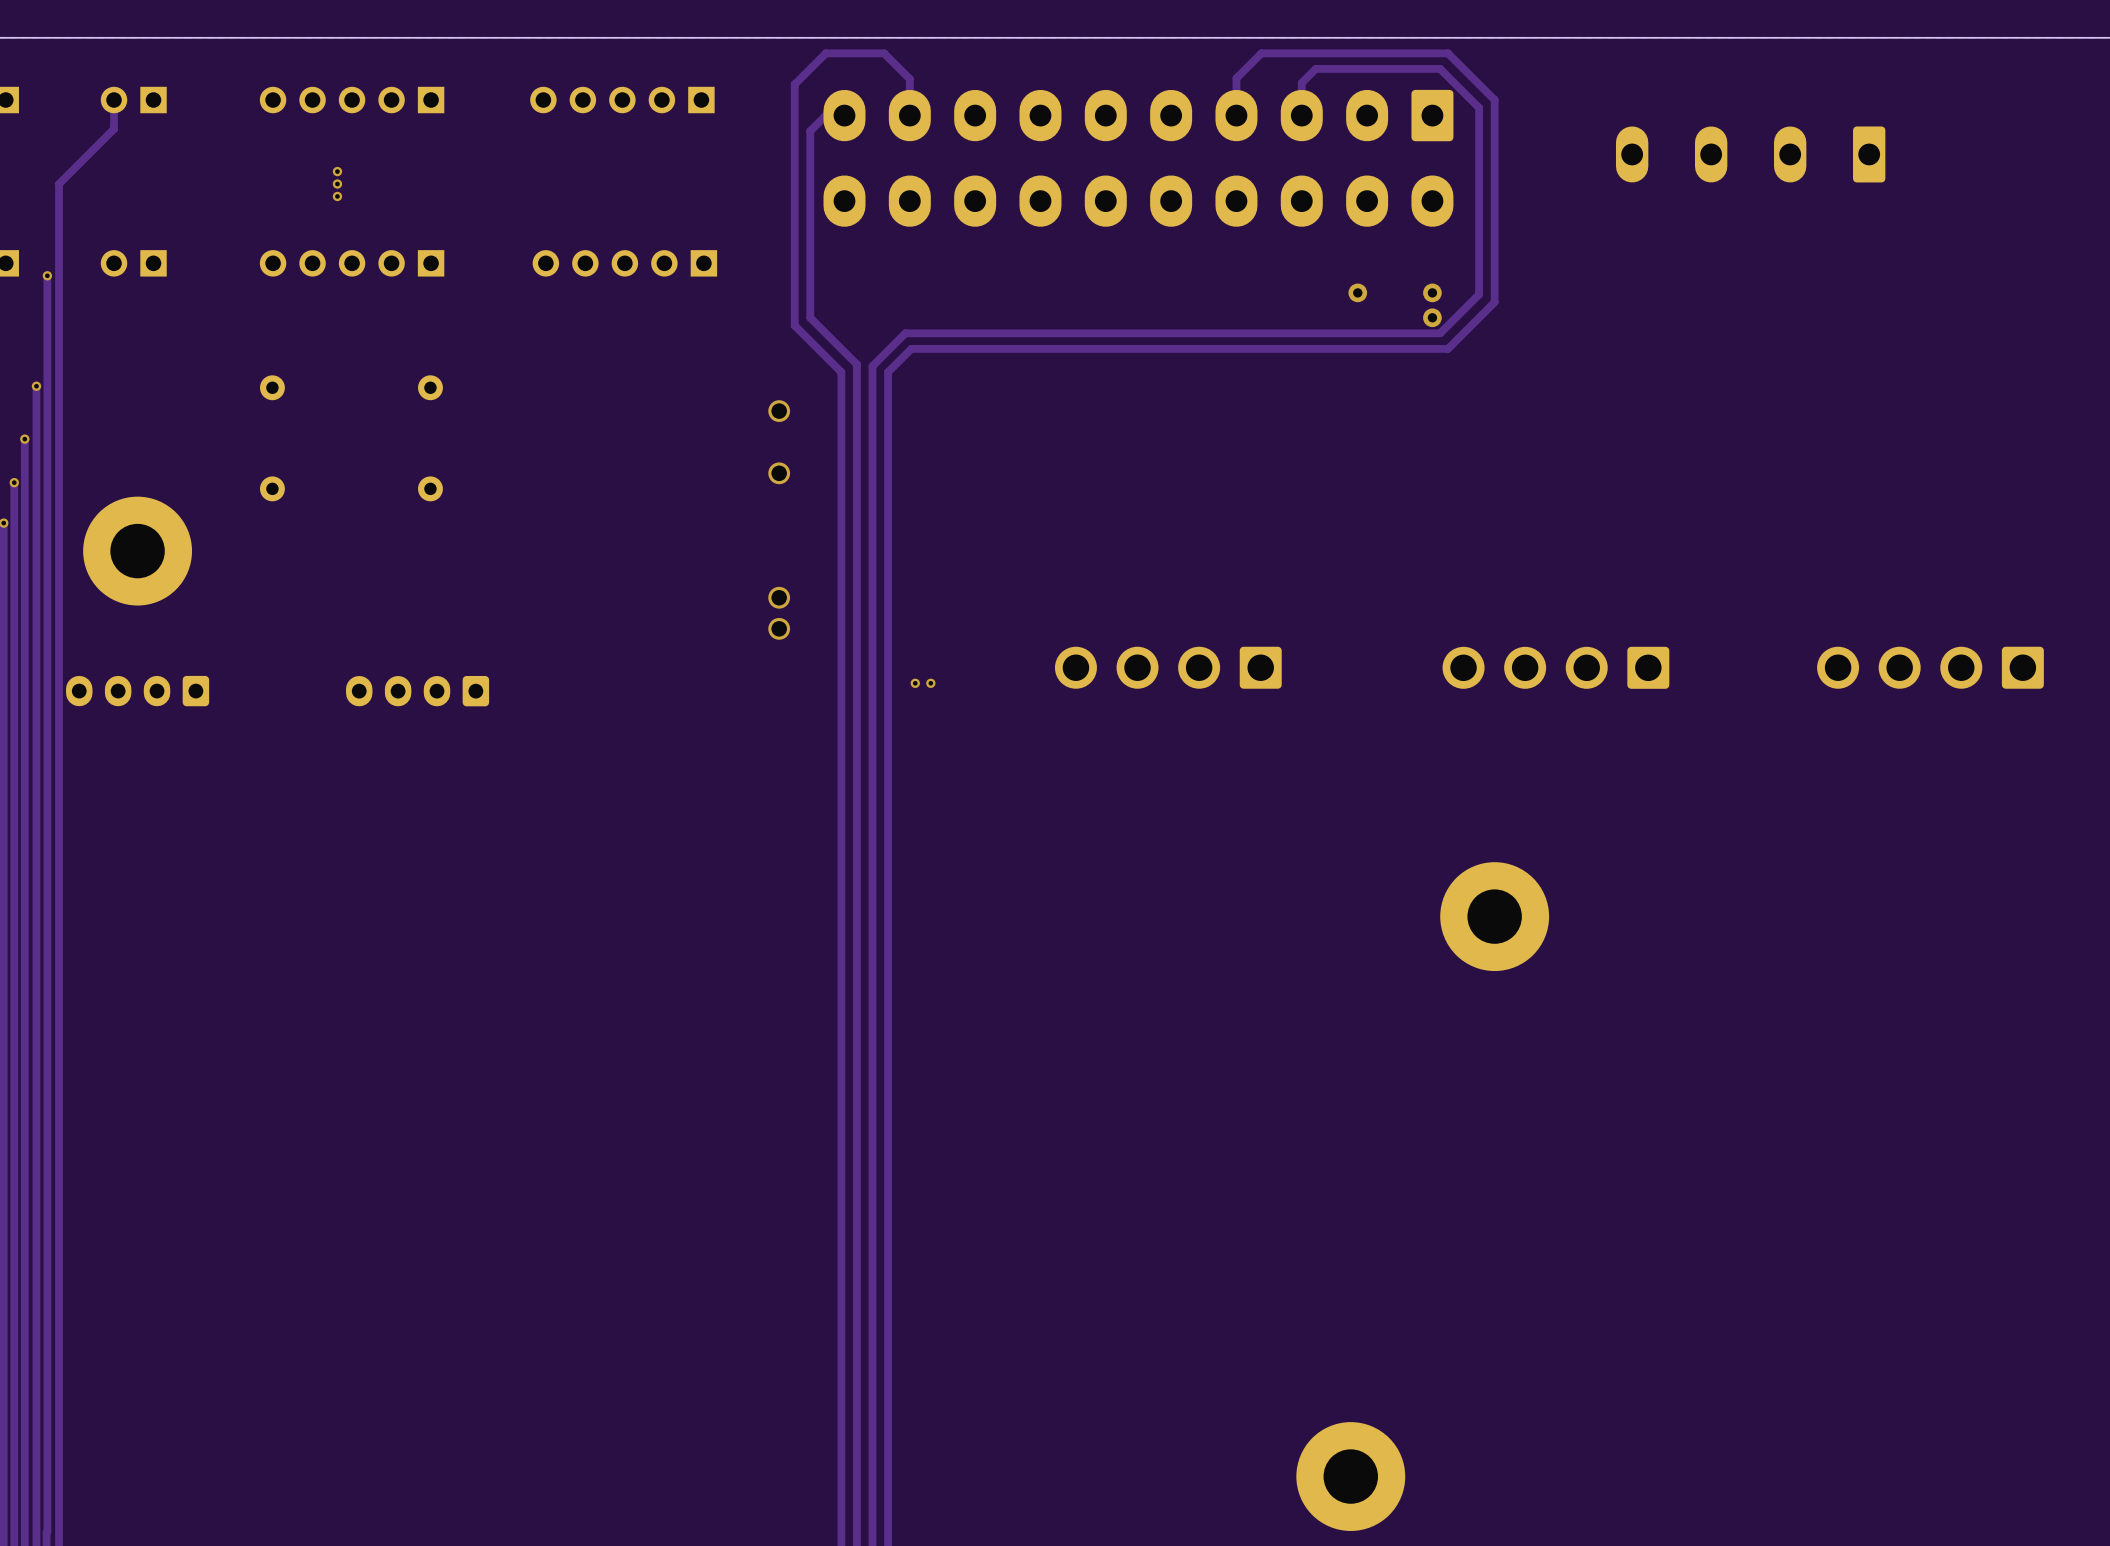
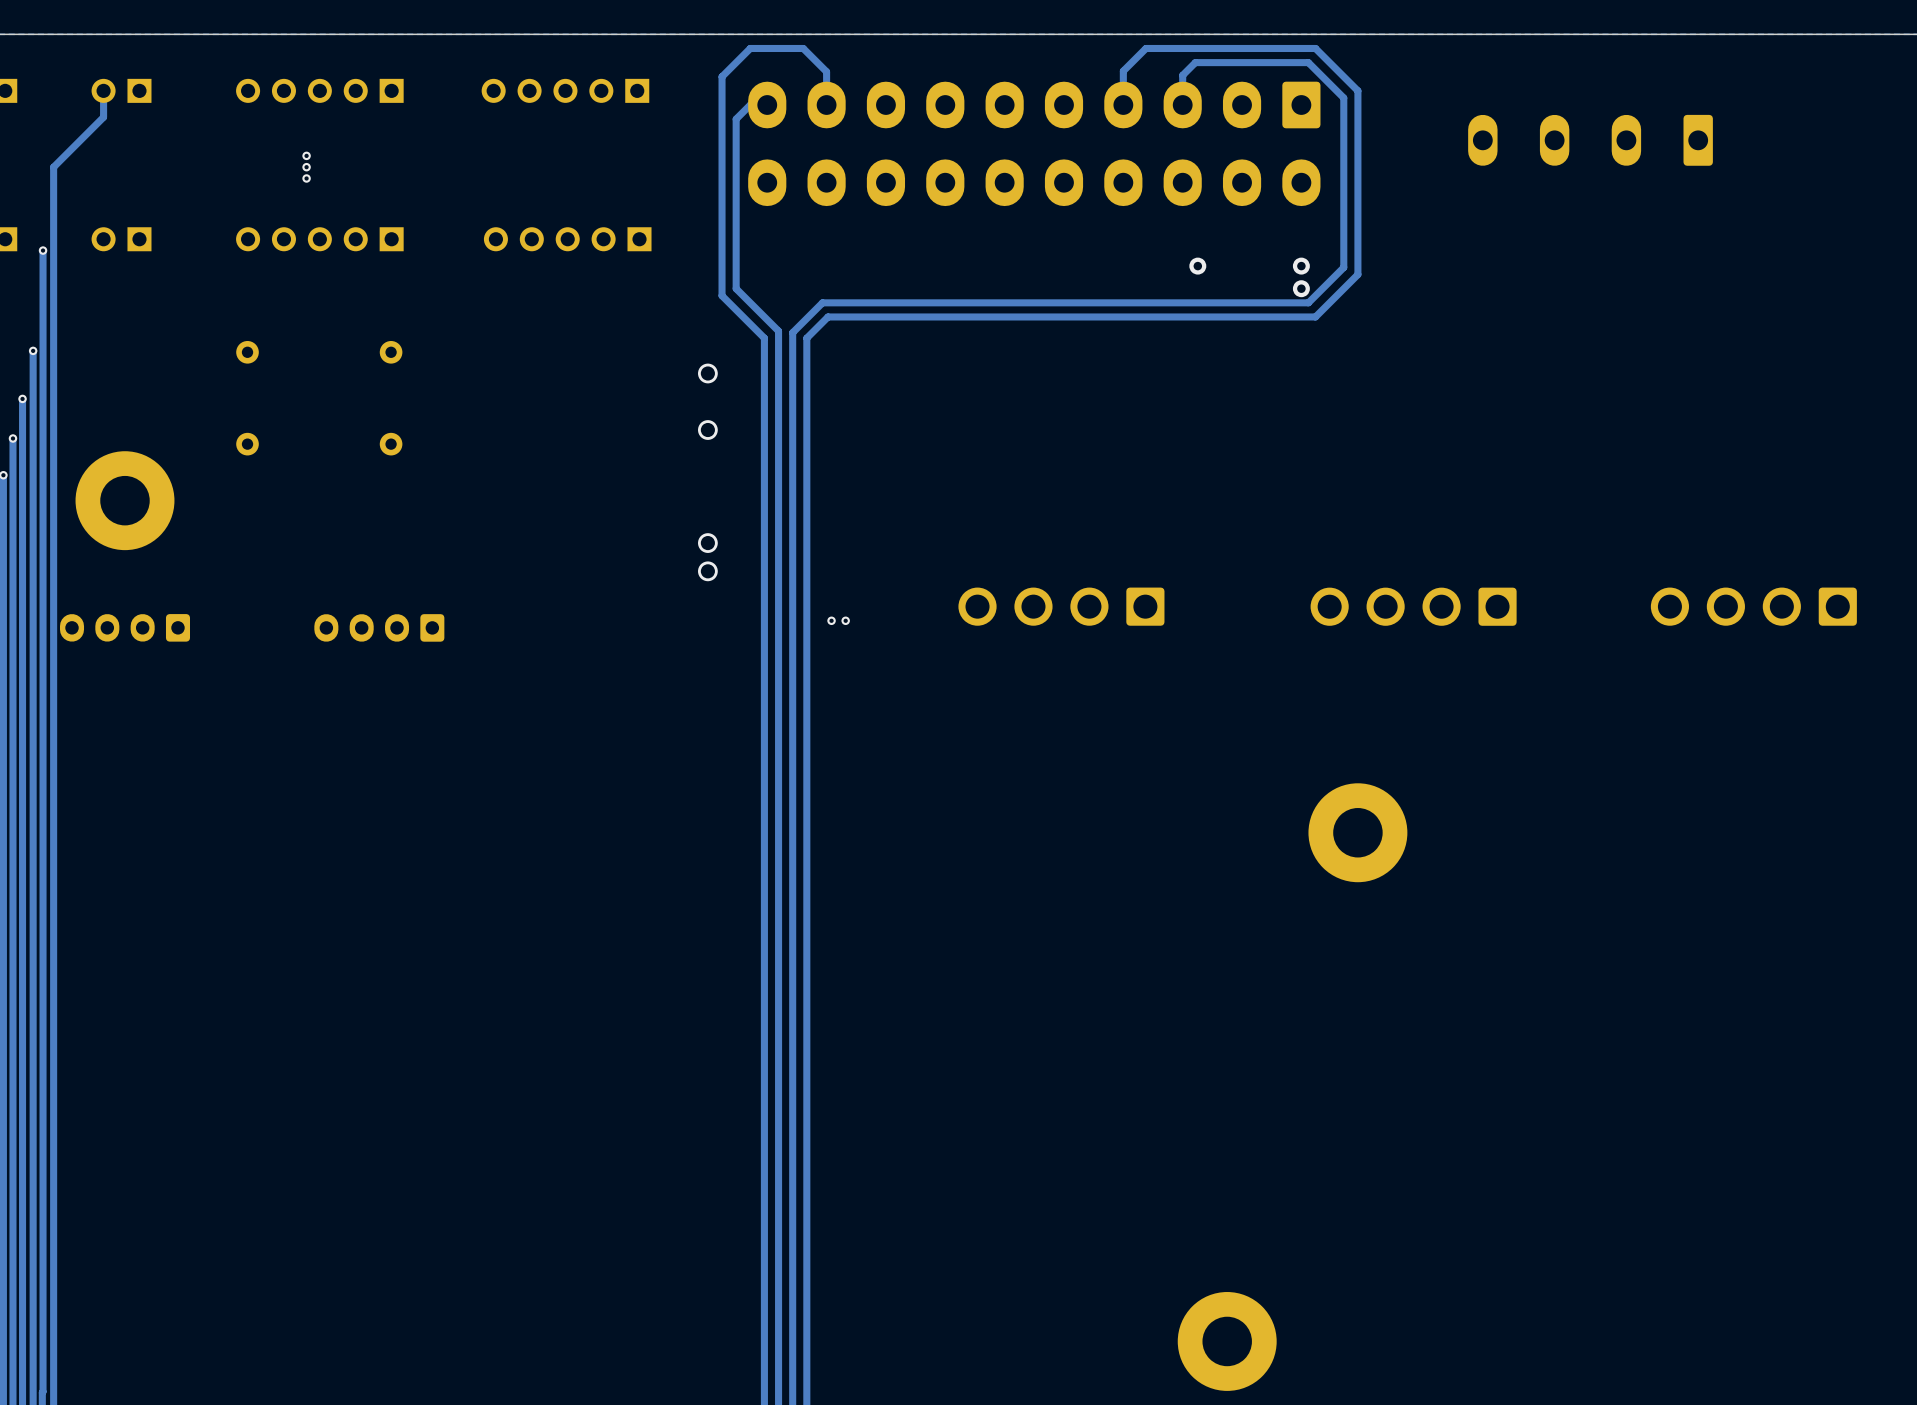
via position: (1357, 292) -> (1197, 266)

